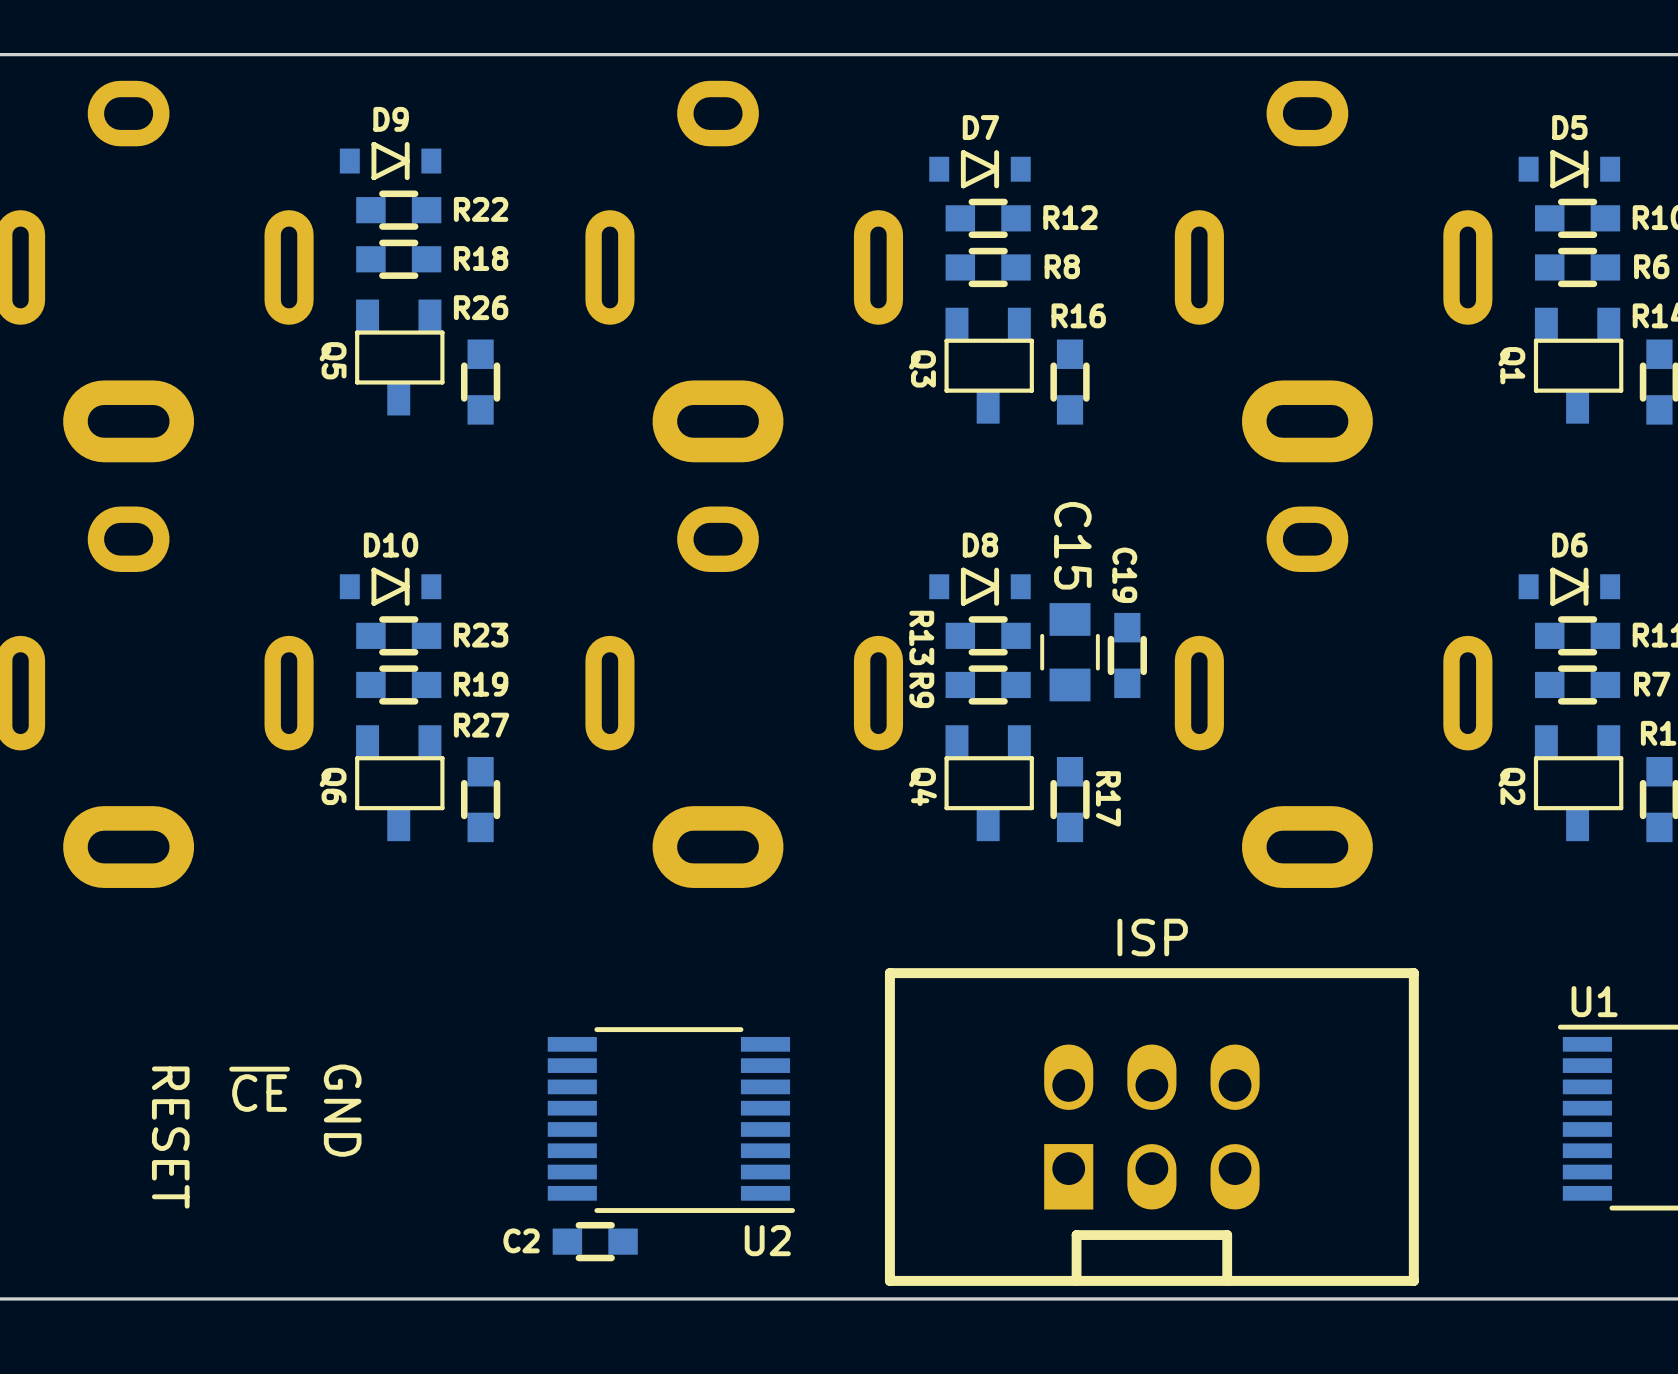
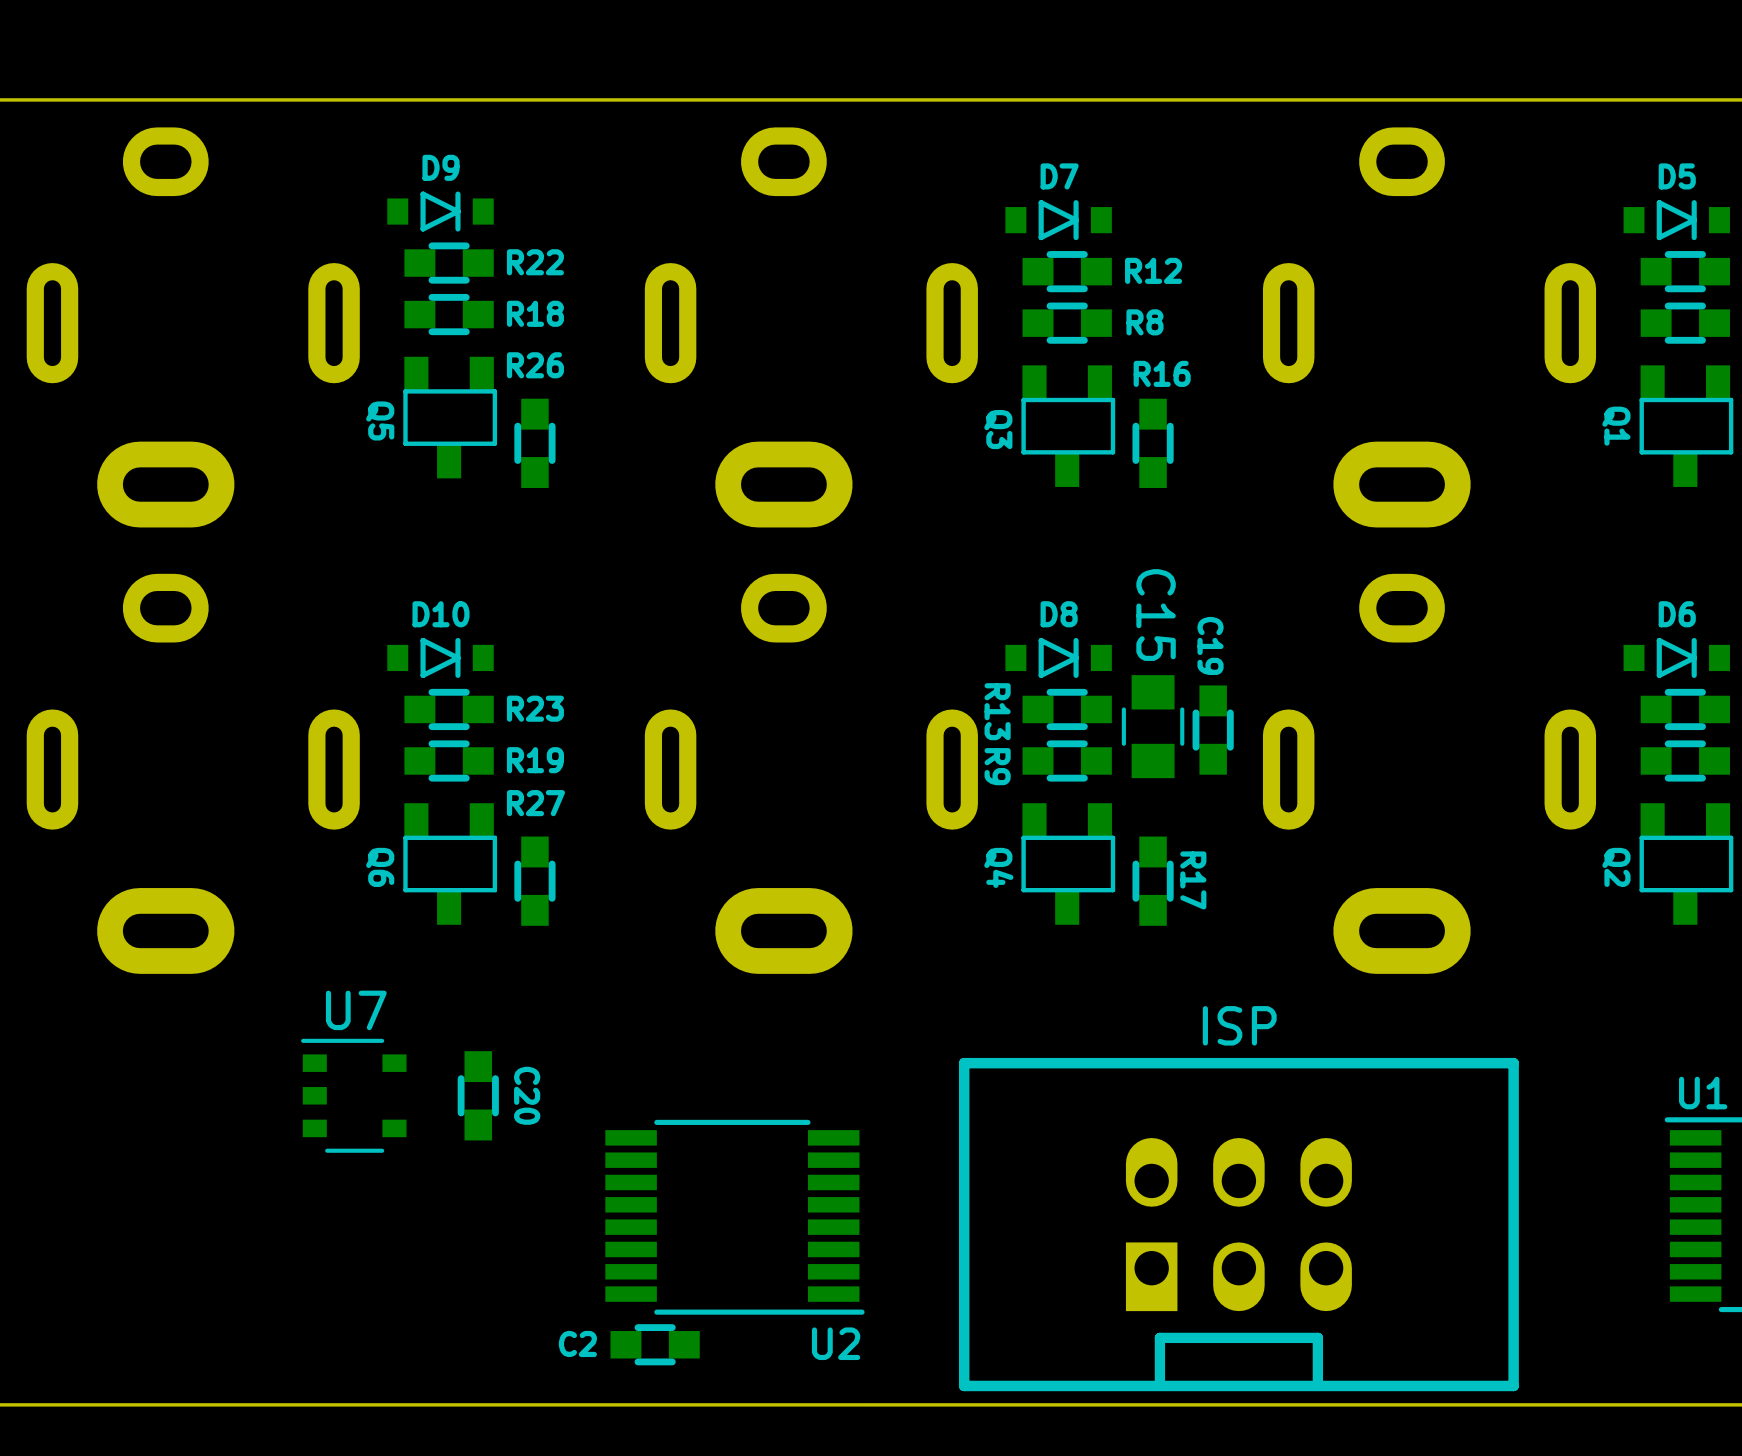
U7: none -> (353, 1095)
C20: none -> (478, 1095)
text: ~{CE} (259, 1089) -> none
text: GND (342, 1110) -> none
text: RESET (170, 1137) -> none

